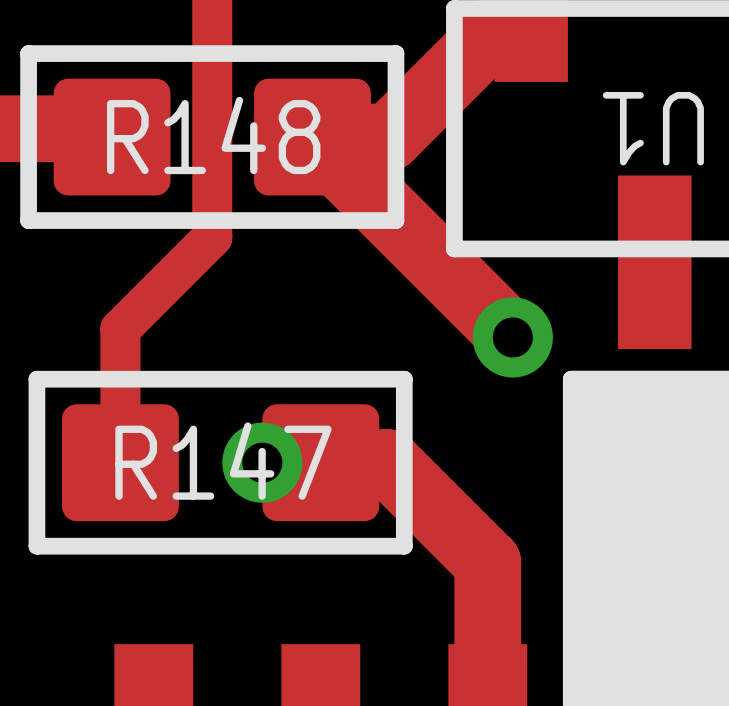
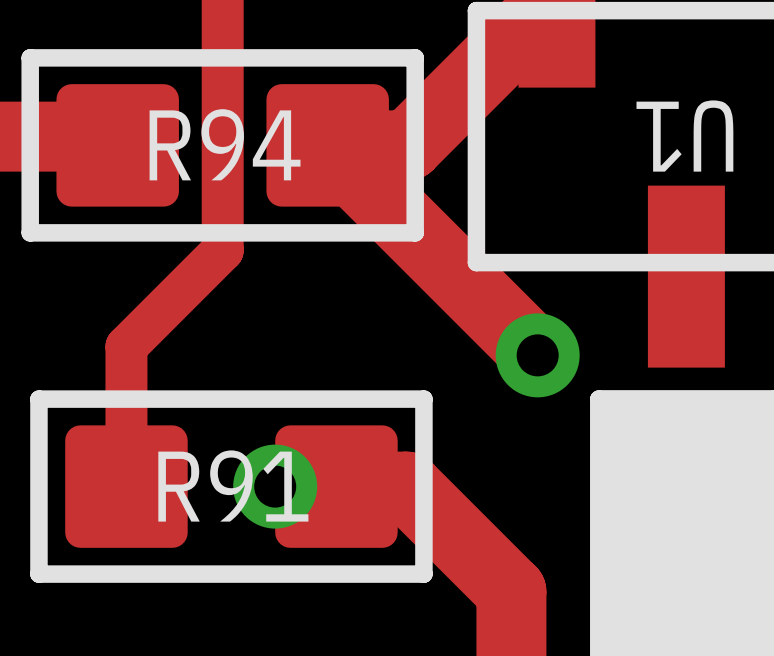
R148 name: R148 (213, 135) -> R94 (225, 144)
R147 name: R147 (223, 461) -> R91 (233, 485)

